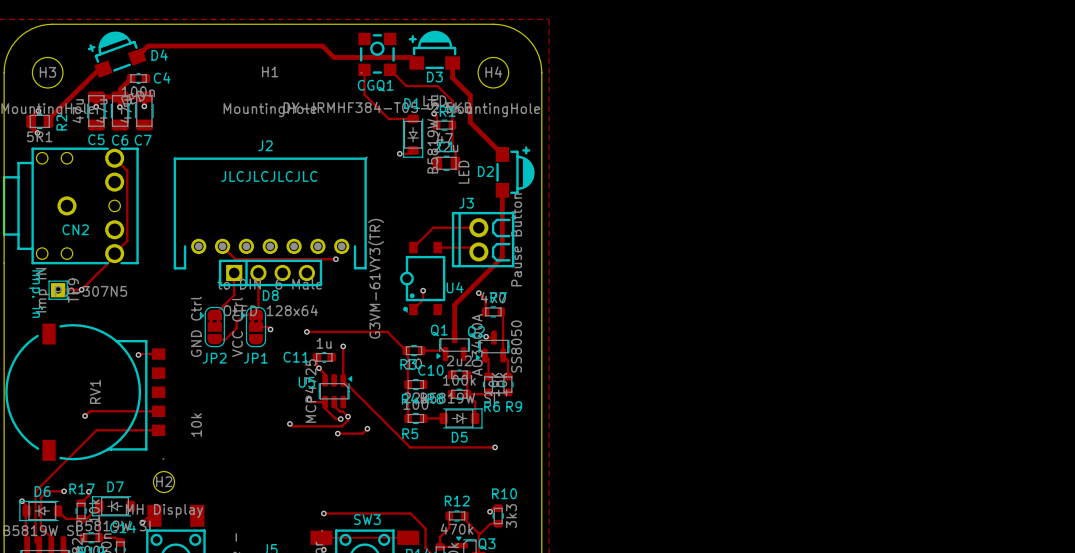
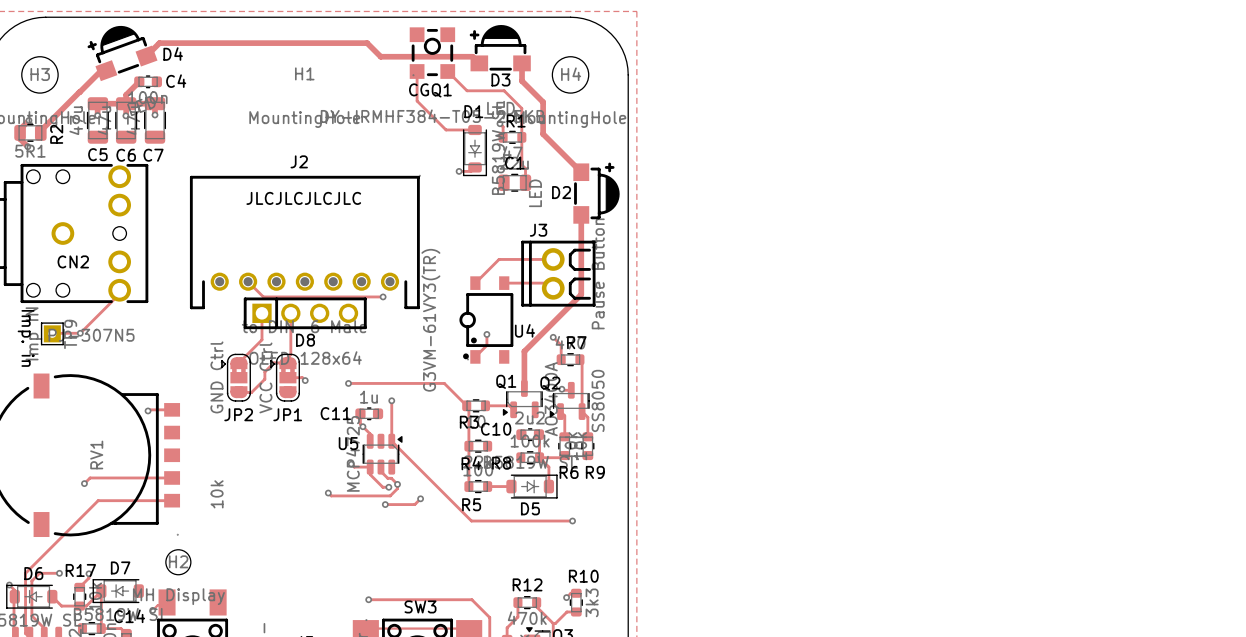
track: (114, 158) (127, 170) (127, 240) (114, 253) -> none

